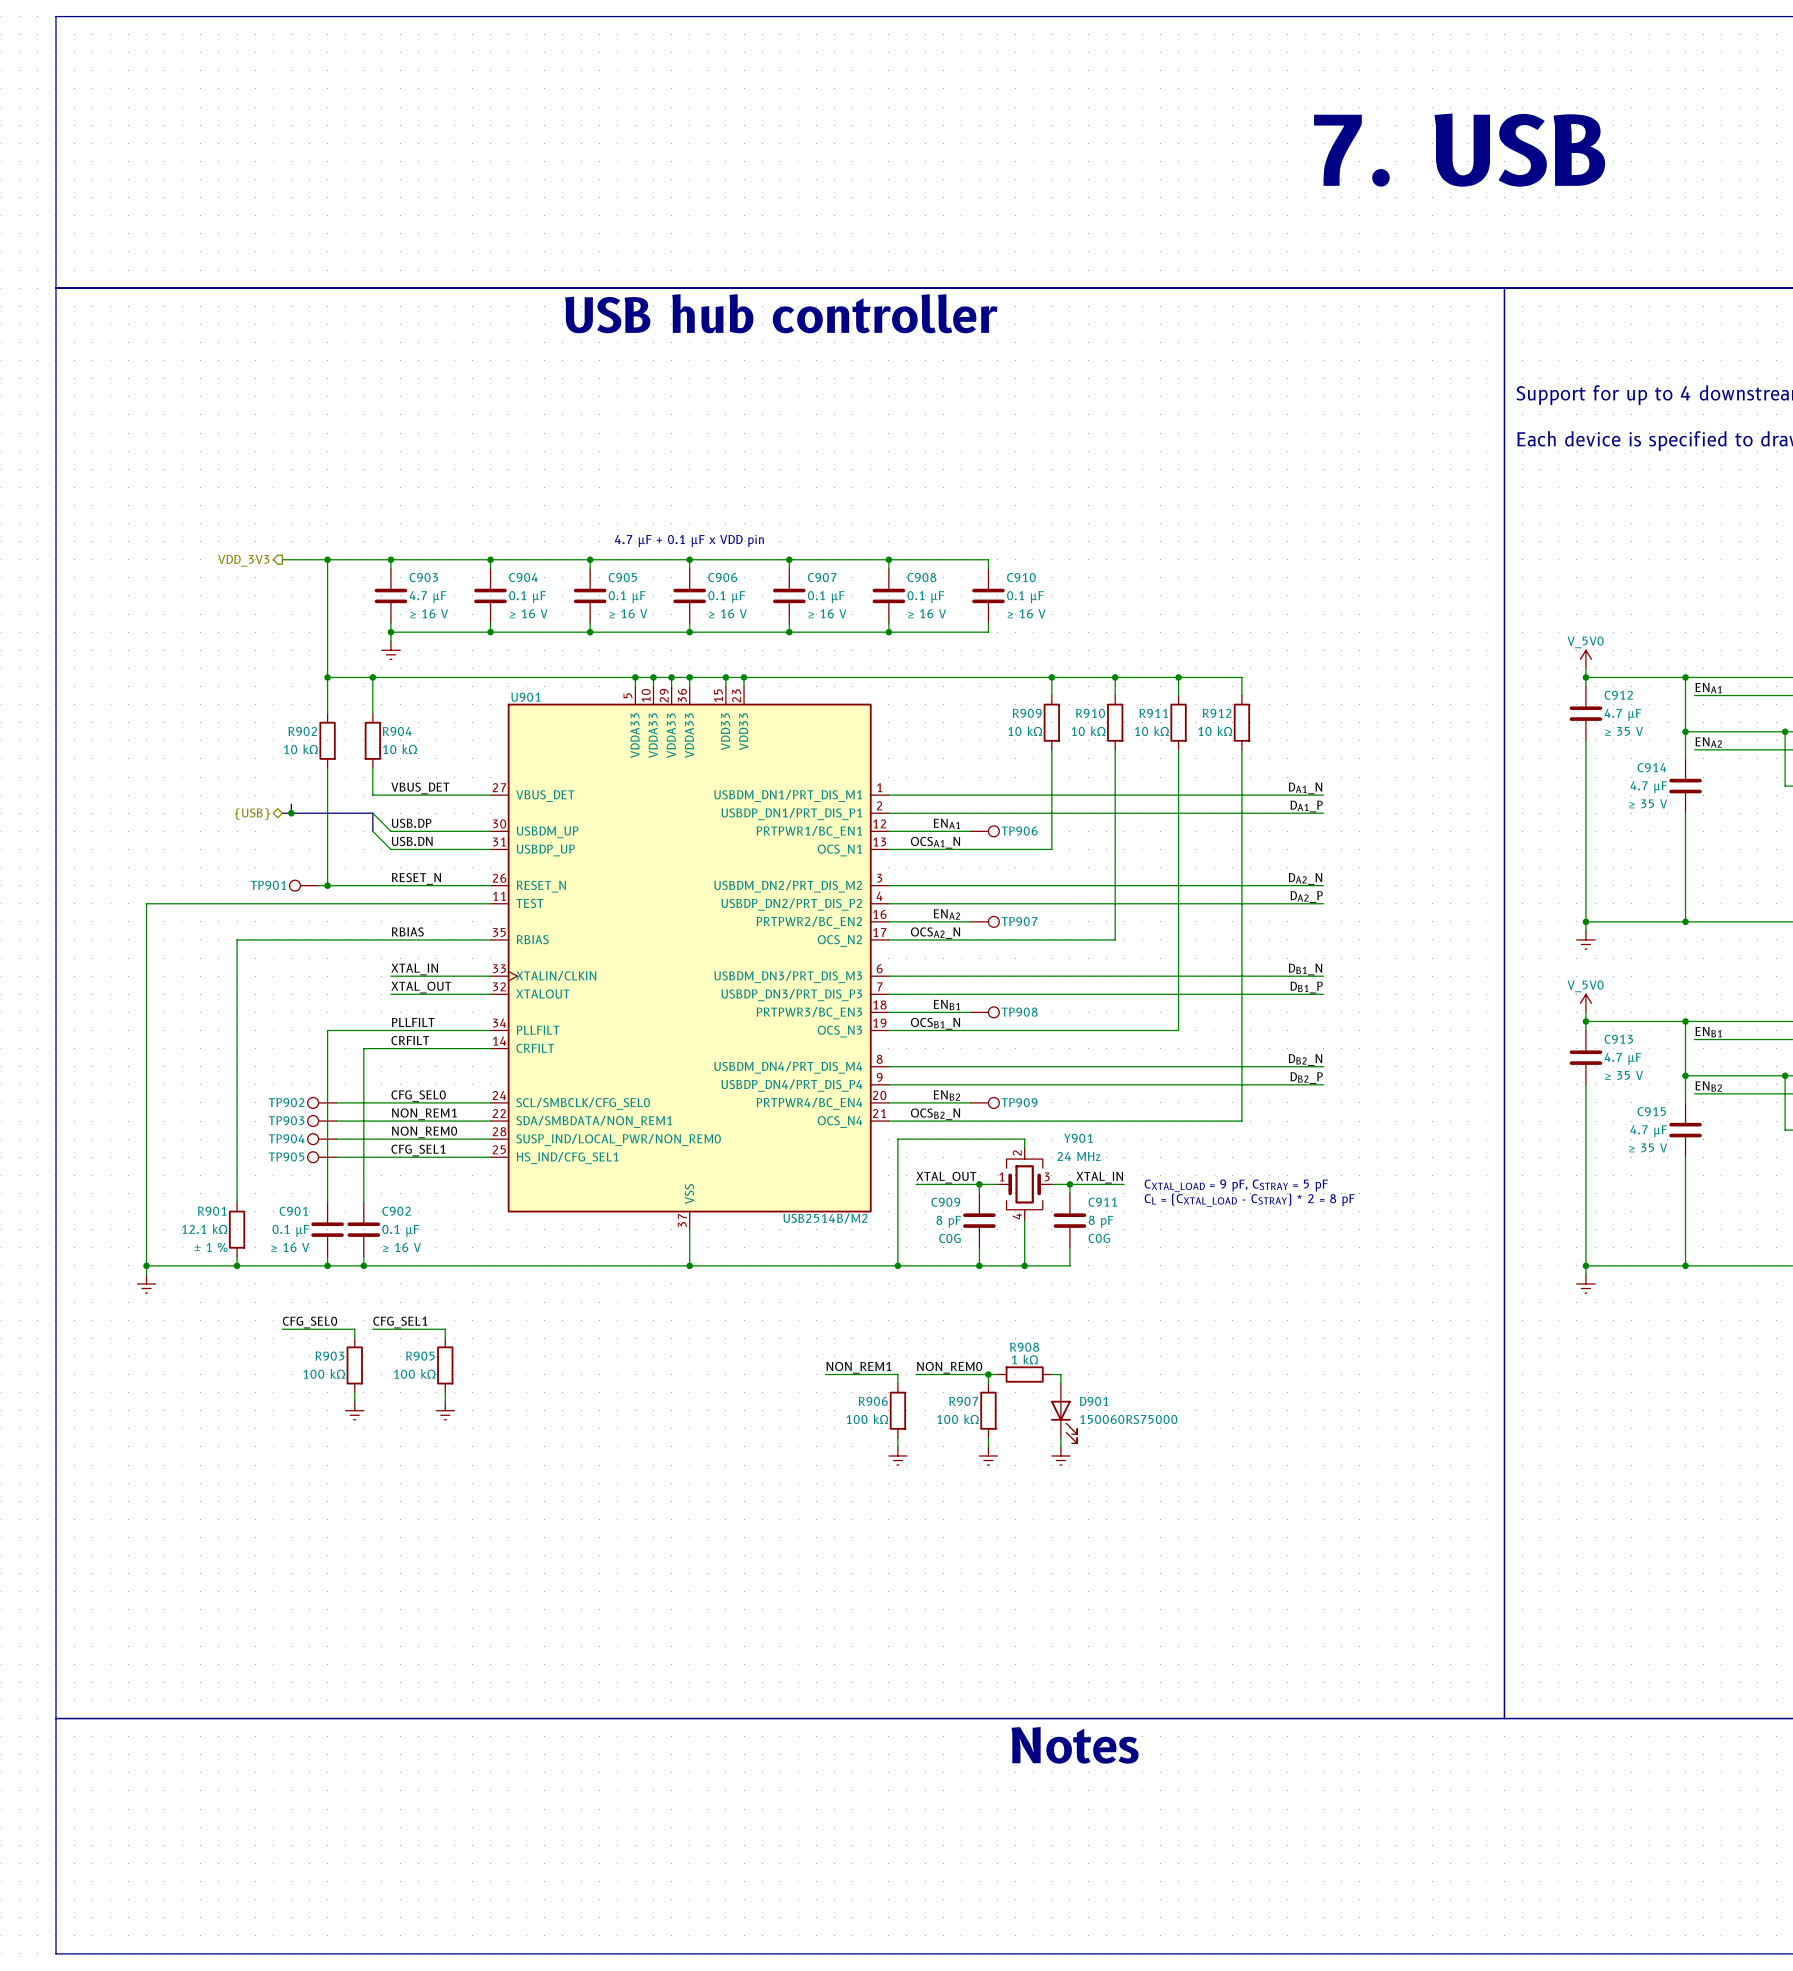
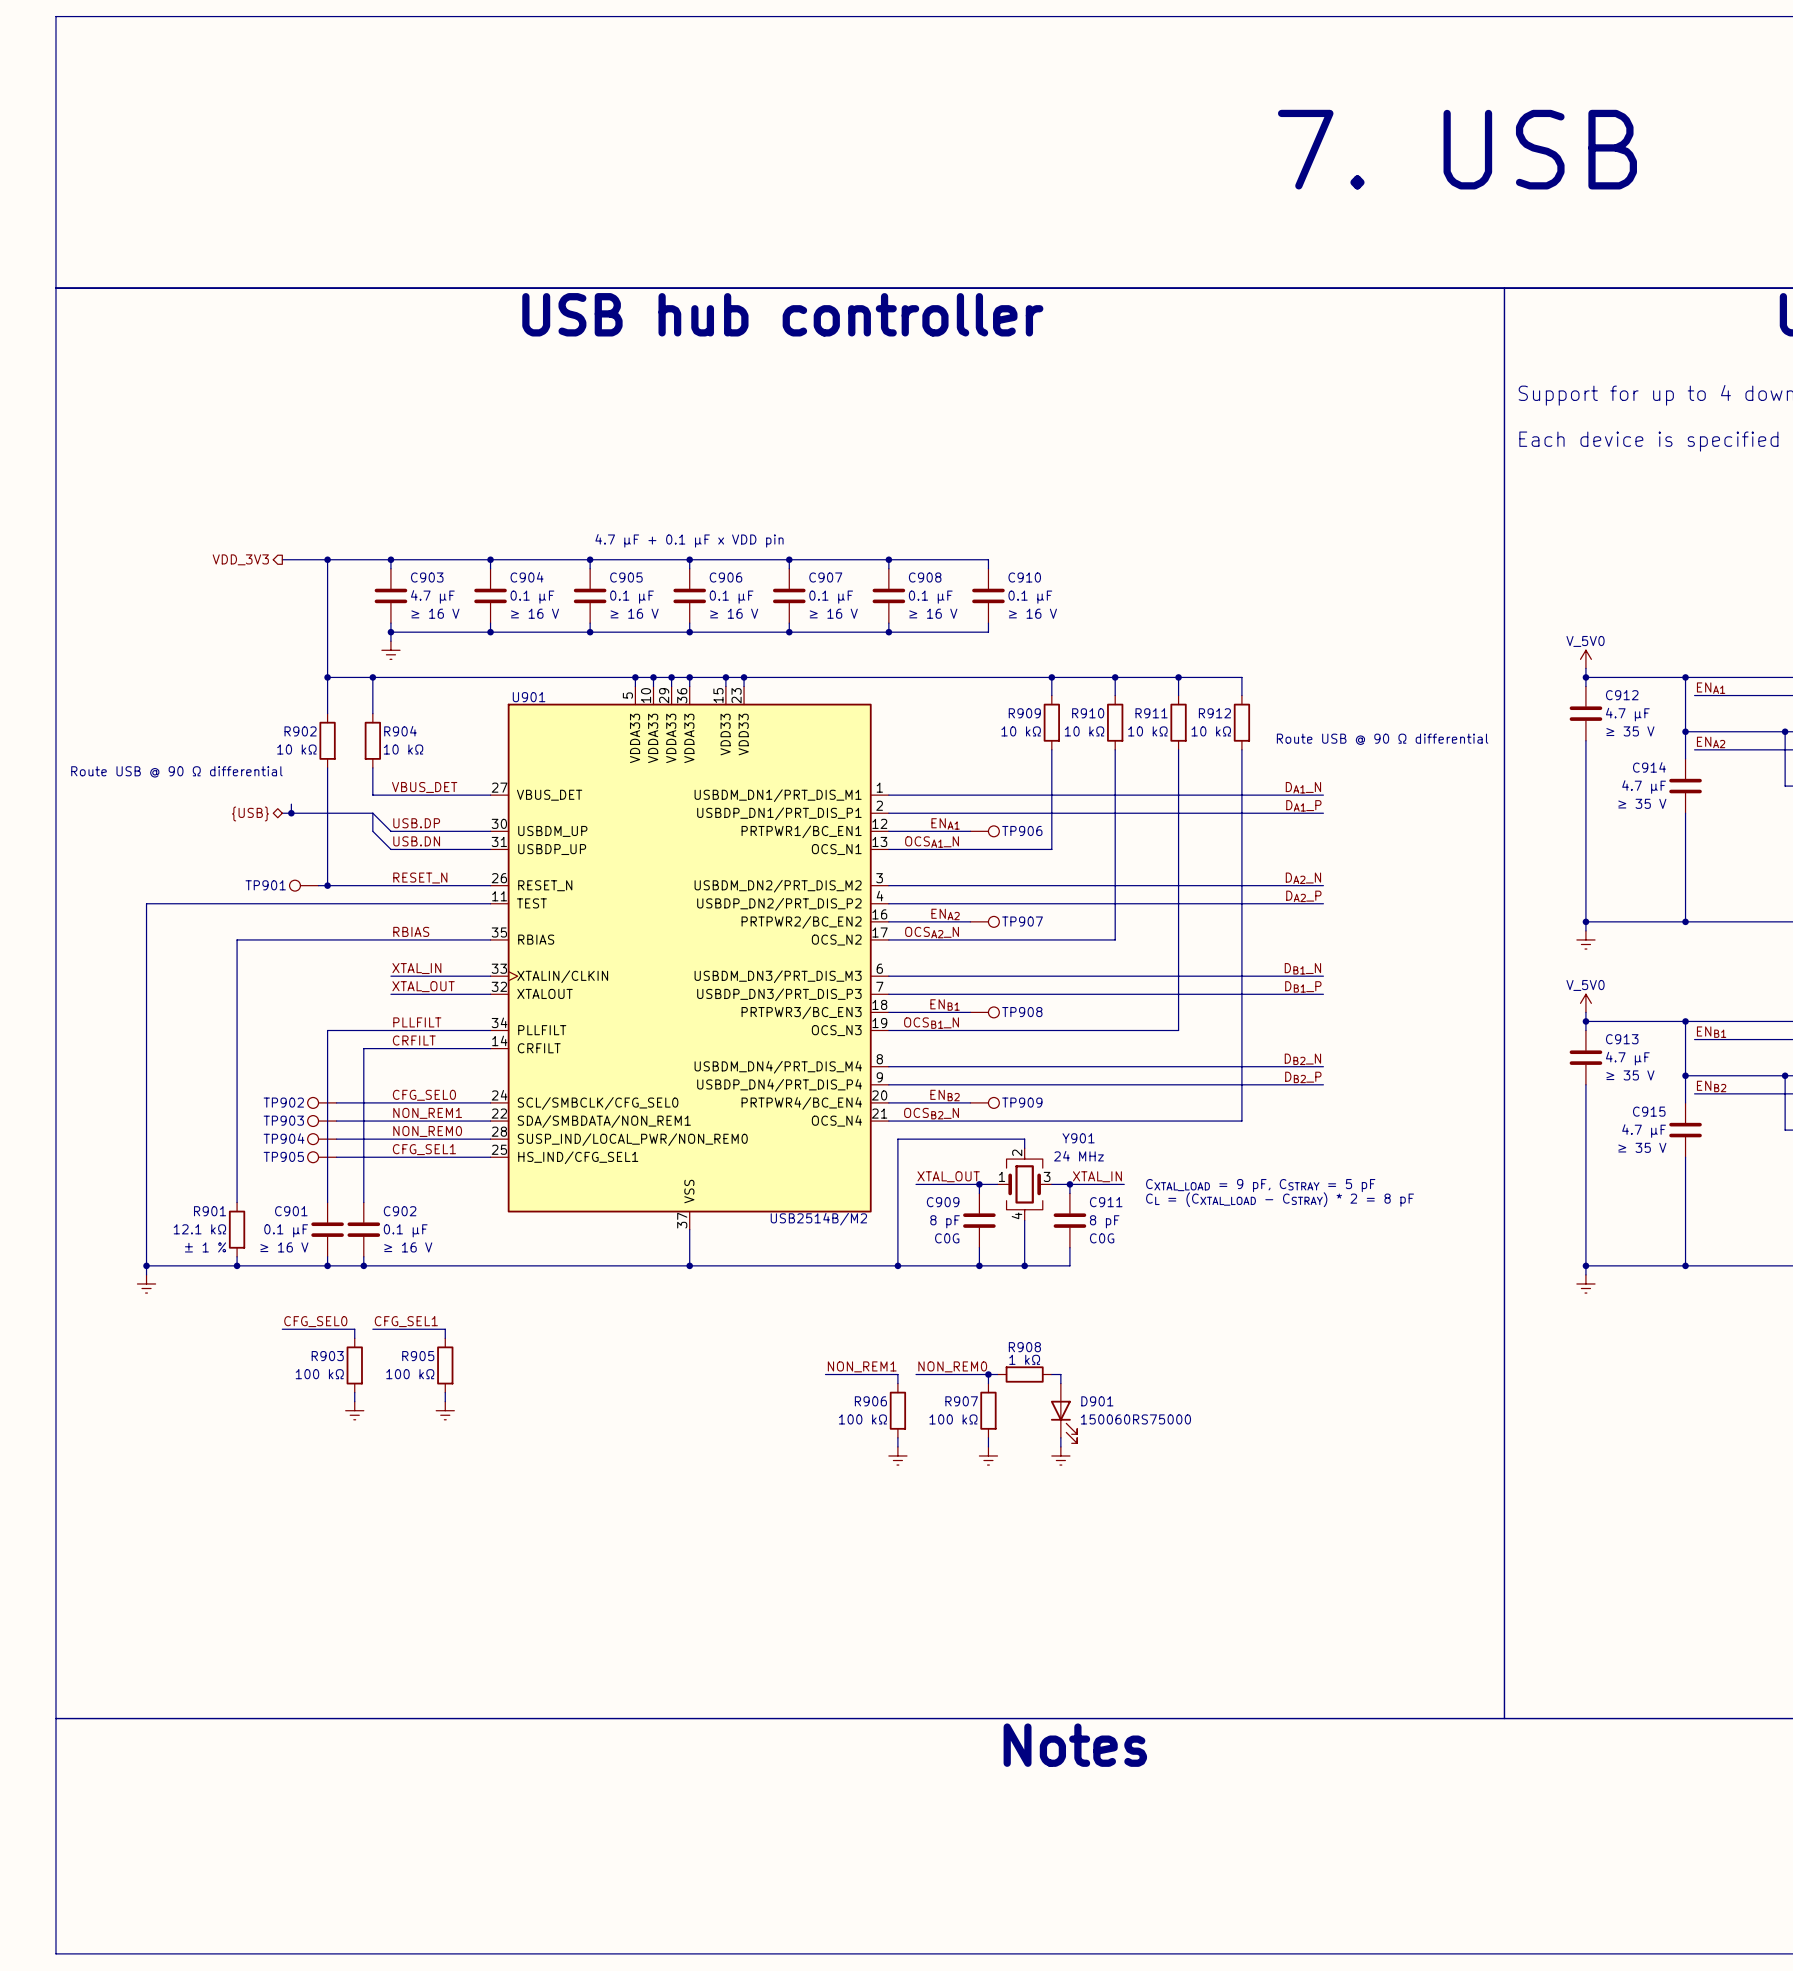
text: none -> Route USB @ 90 Ω differential (1382, 739)
text: none -> Route USB @ 90 Ω differential (176, 771)

